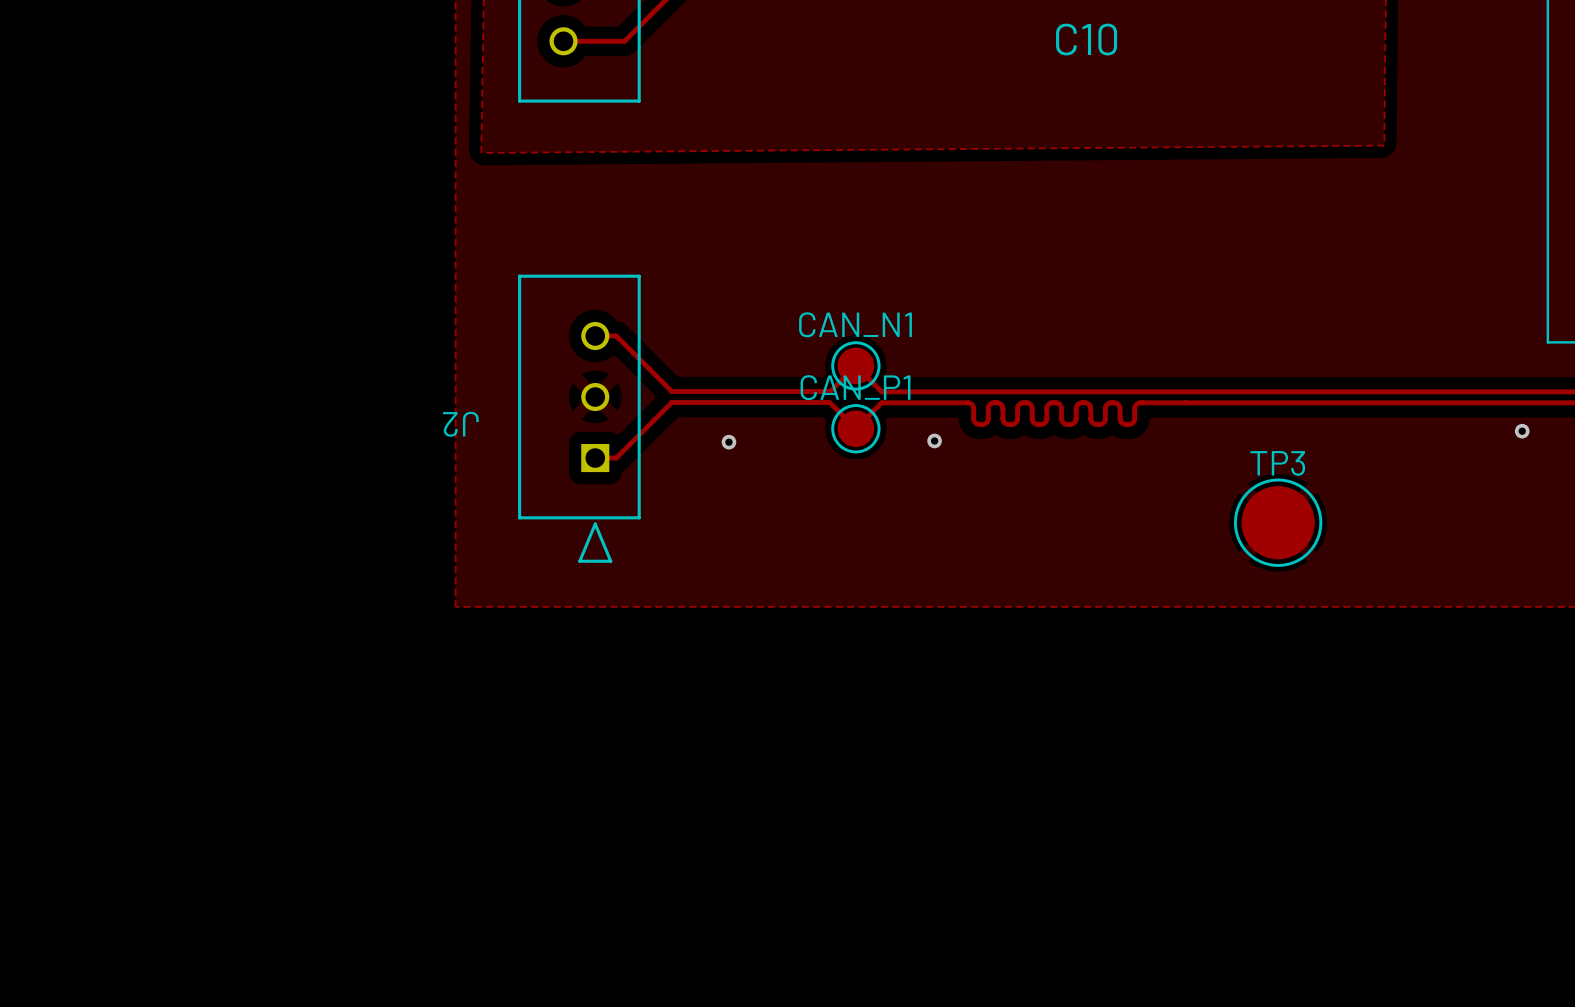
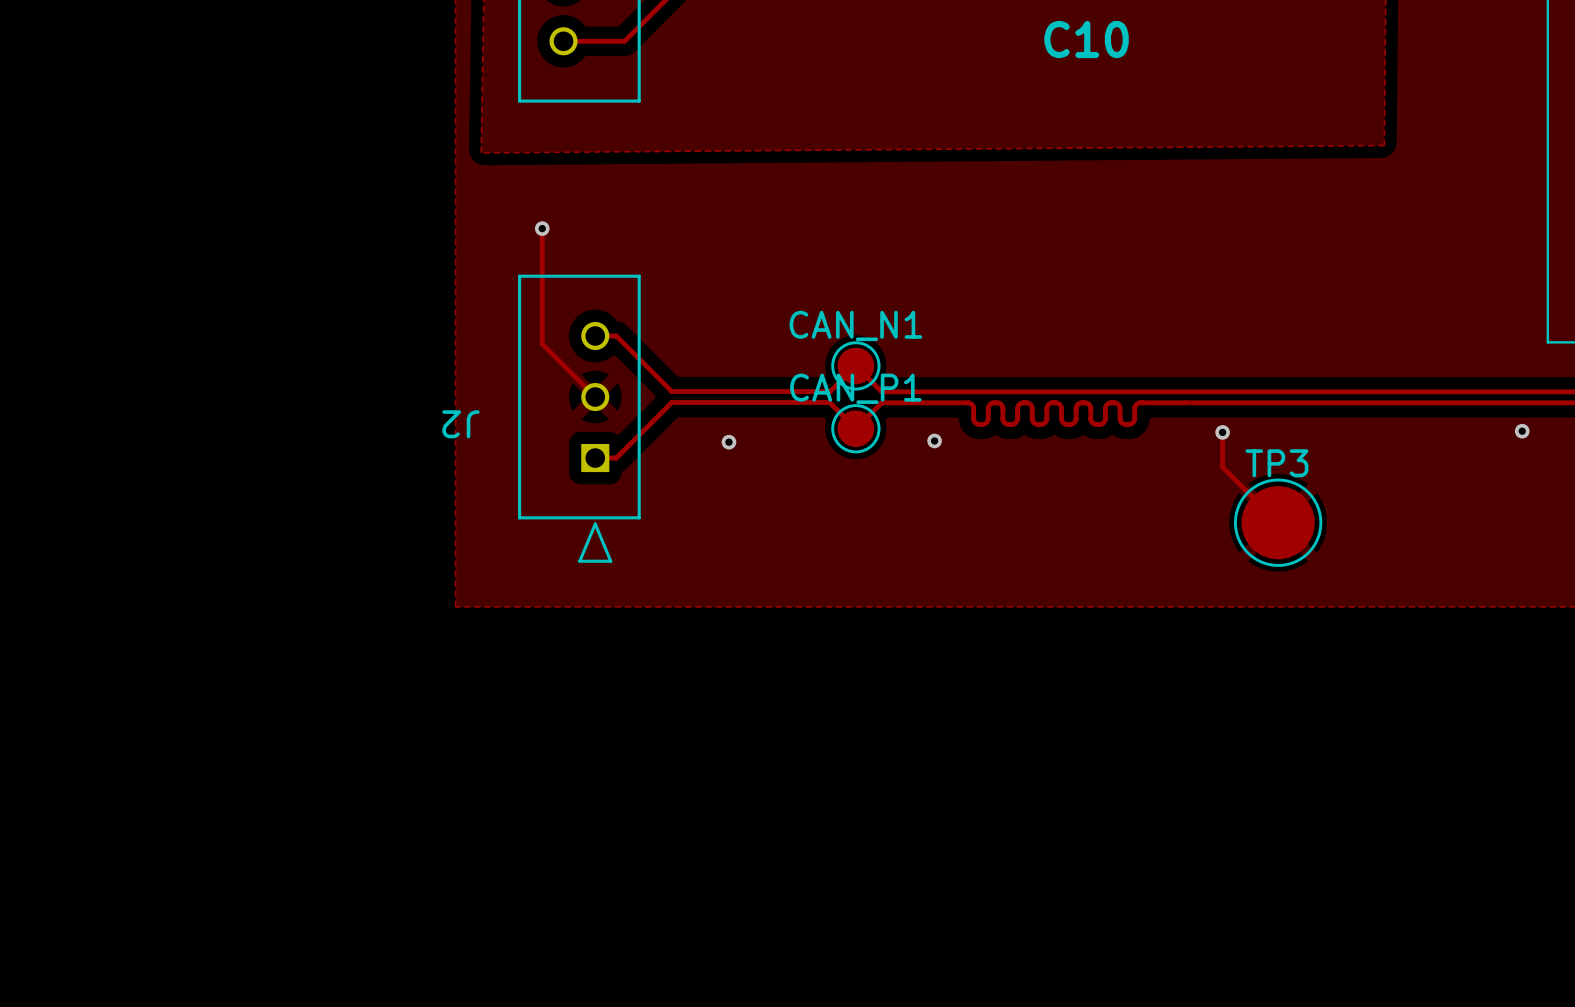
track: none -> (542, 228) (542, 343) (595, 397)
via: none -> (542, 228)
track: none -> (1222, 432) (1222, 467) (1278, 522)
via: none -> (1222, 432)

